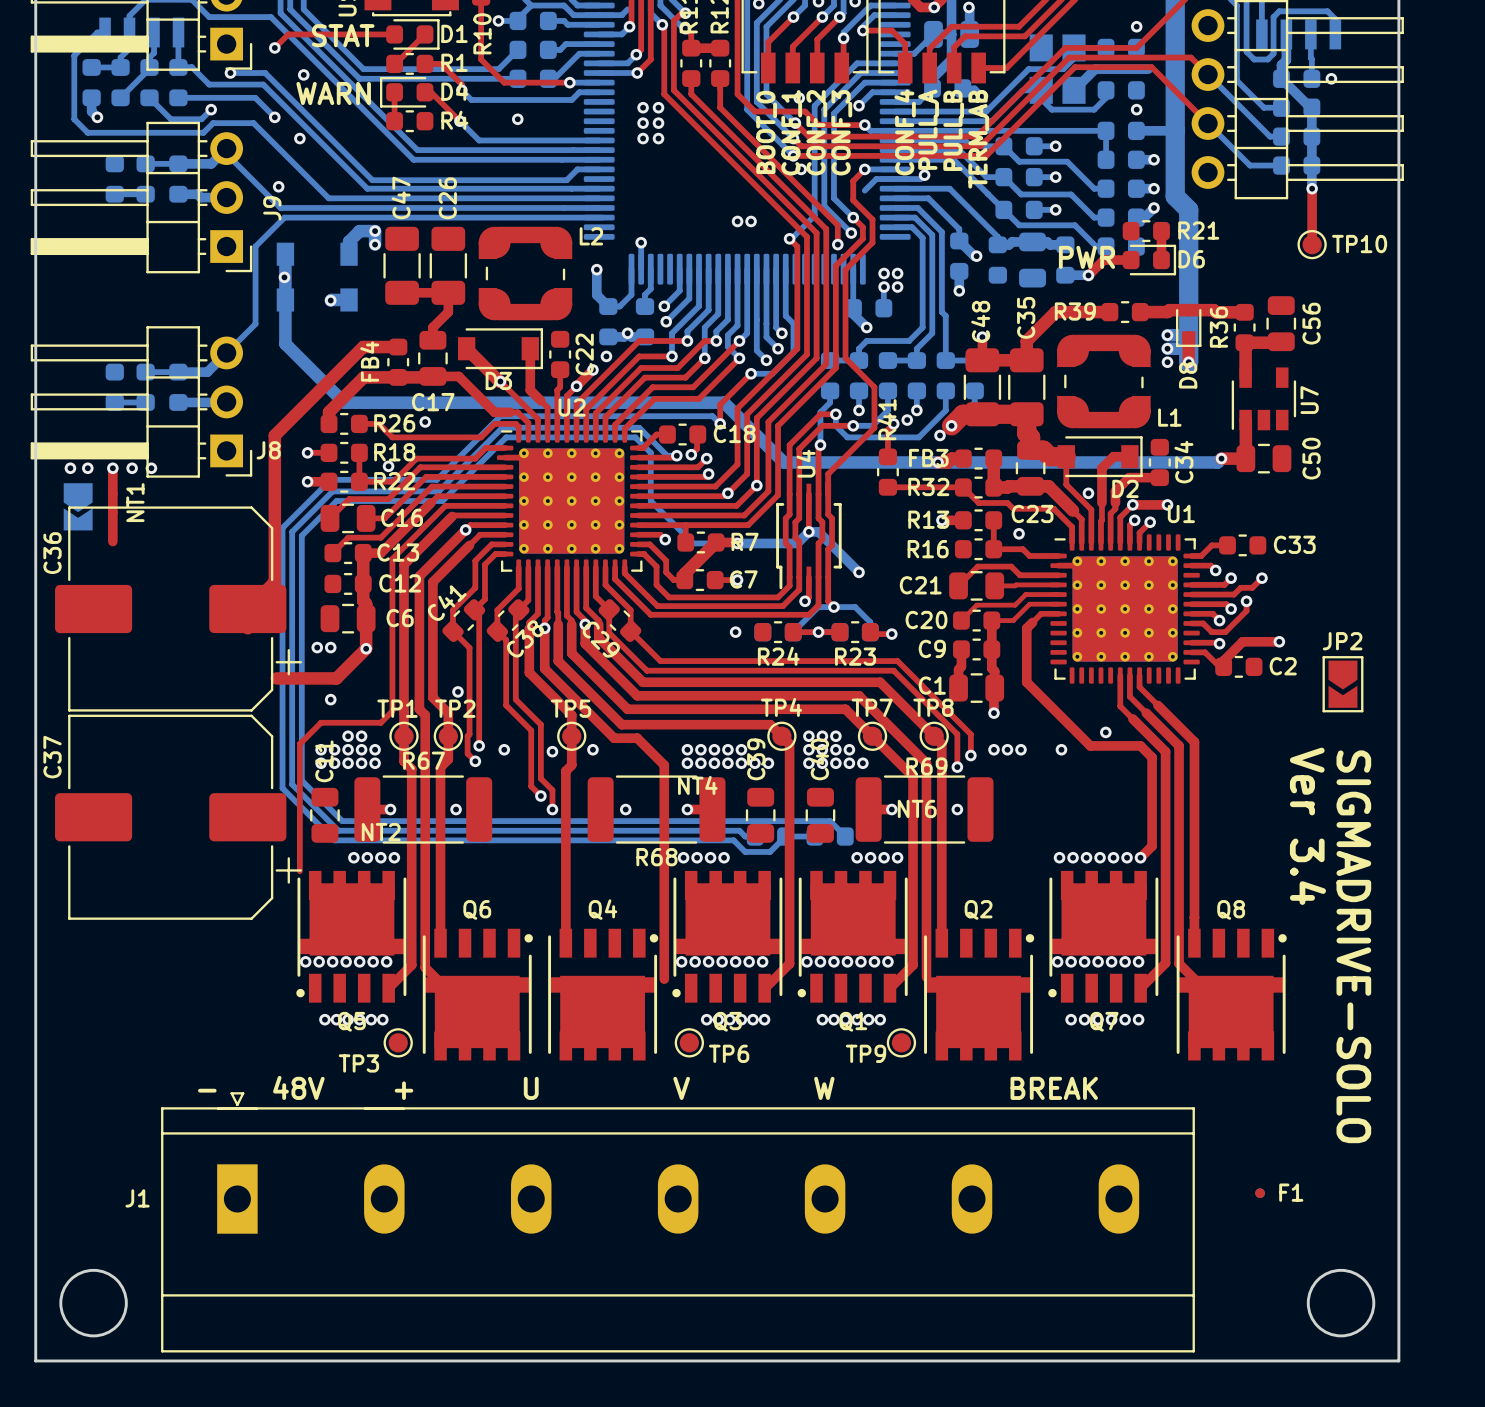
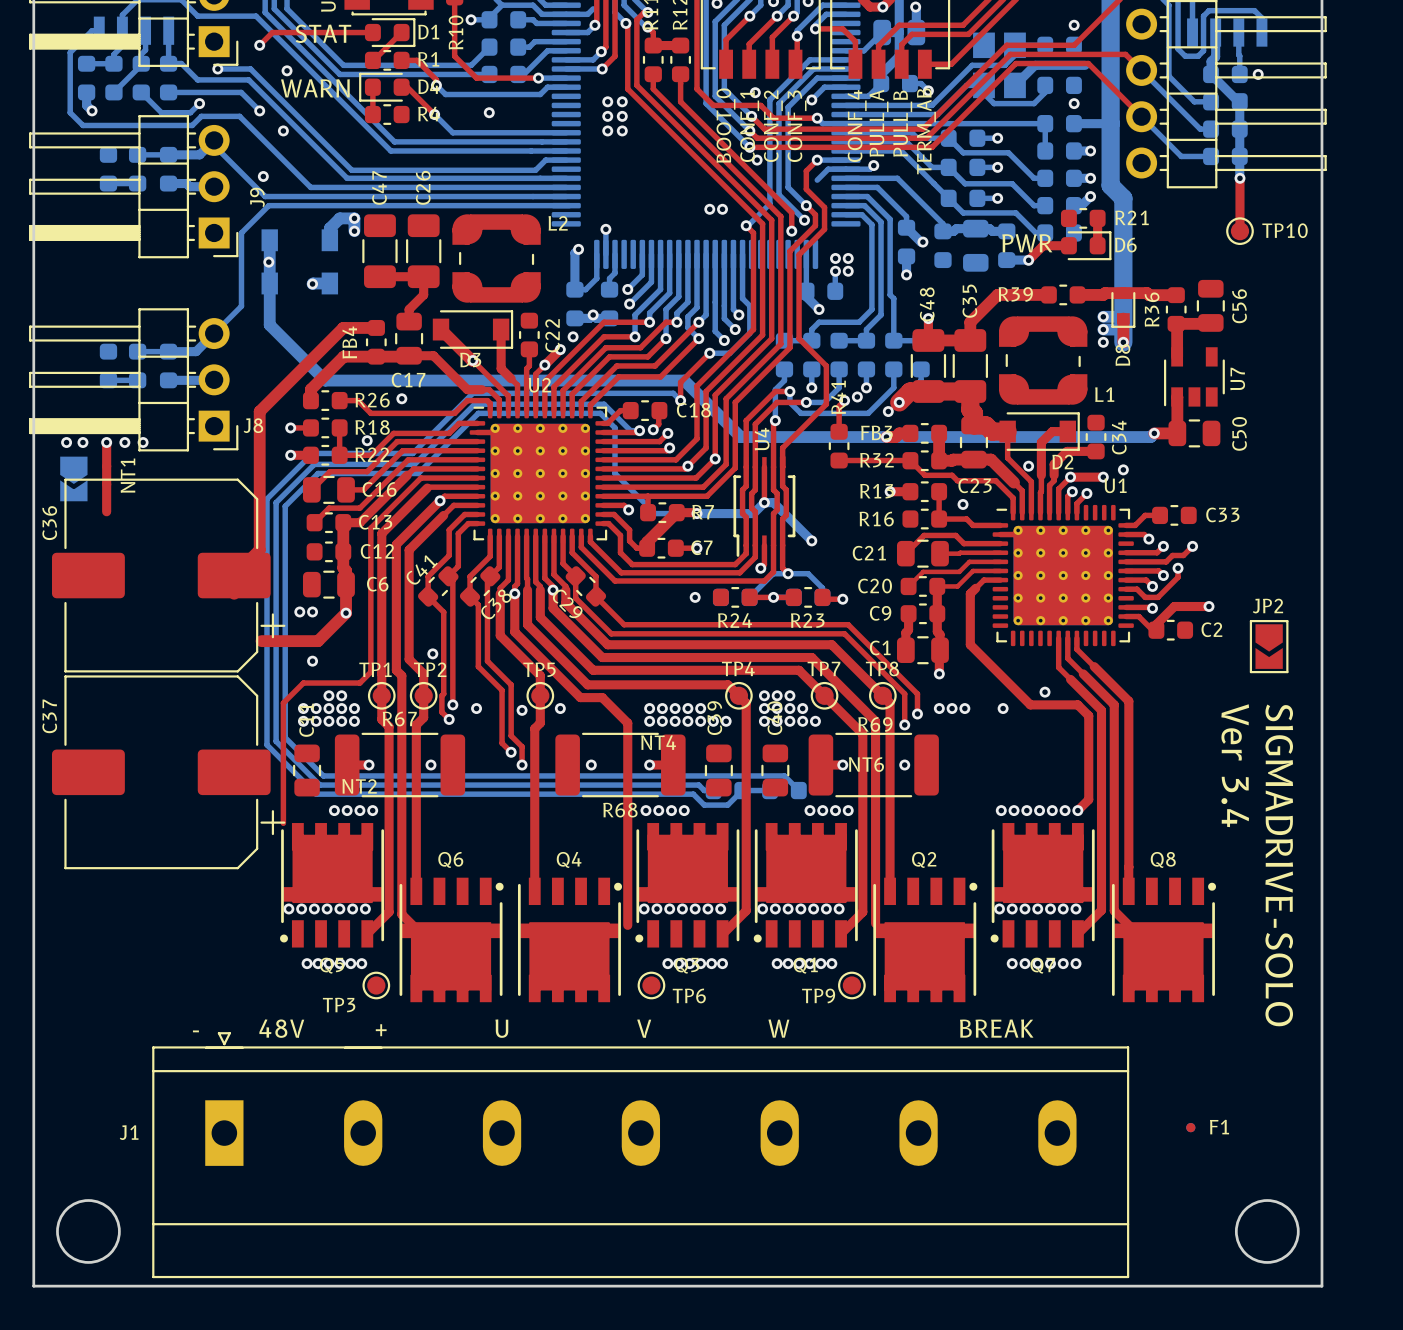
via position: (737, 221) -> (722, 209)
bottom track: (596, 269) (596, 294) (608, 306) -> (578, 249) (574, 253) (574, 289)
via position: (596, 269) -> (578, 249)
via: none -> (1123, 469)

